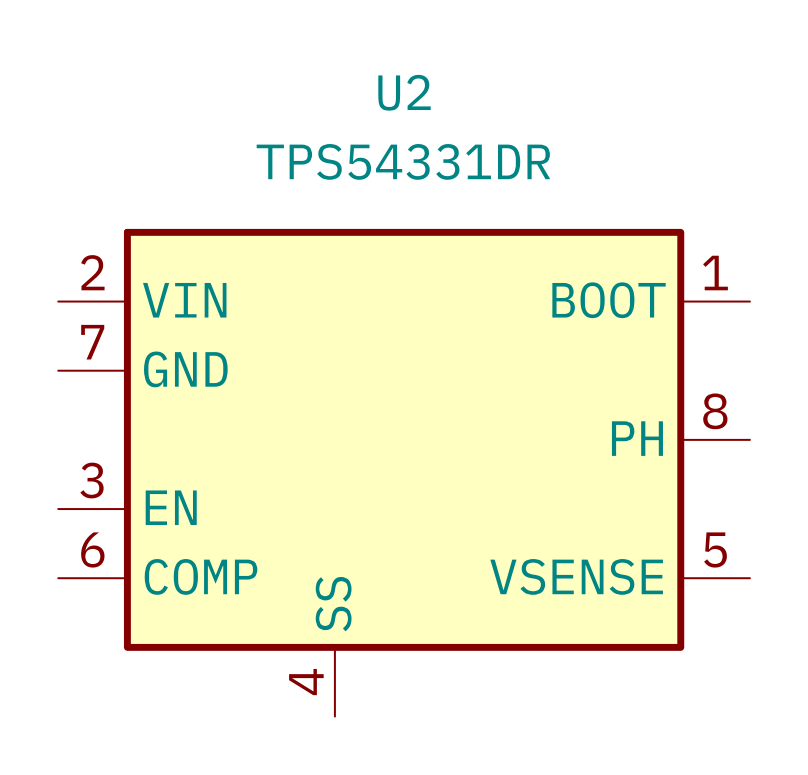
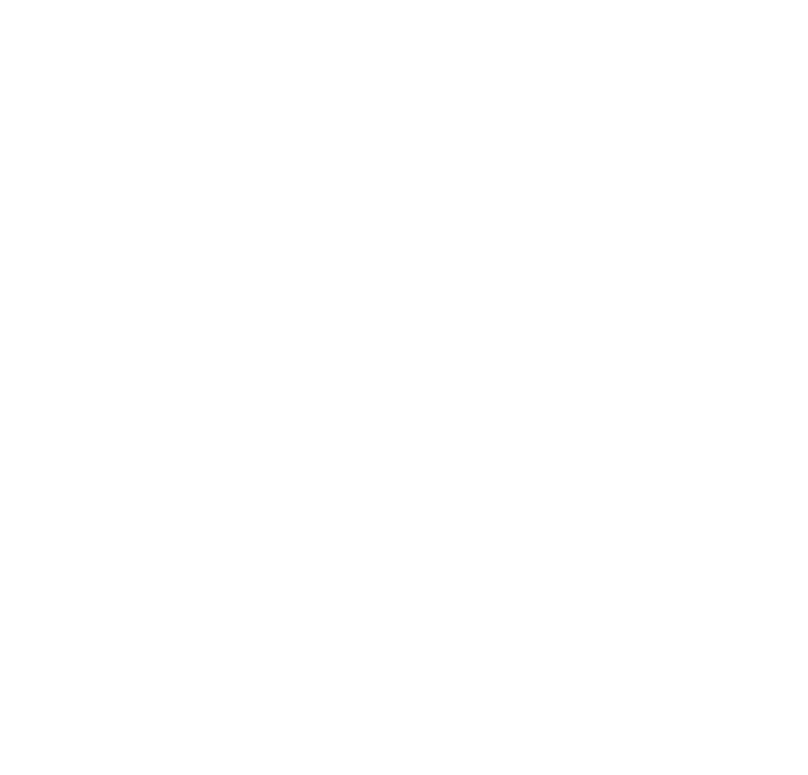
U2: TPS54331DR (404, 472) -> none

